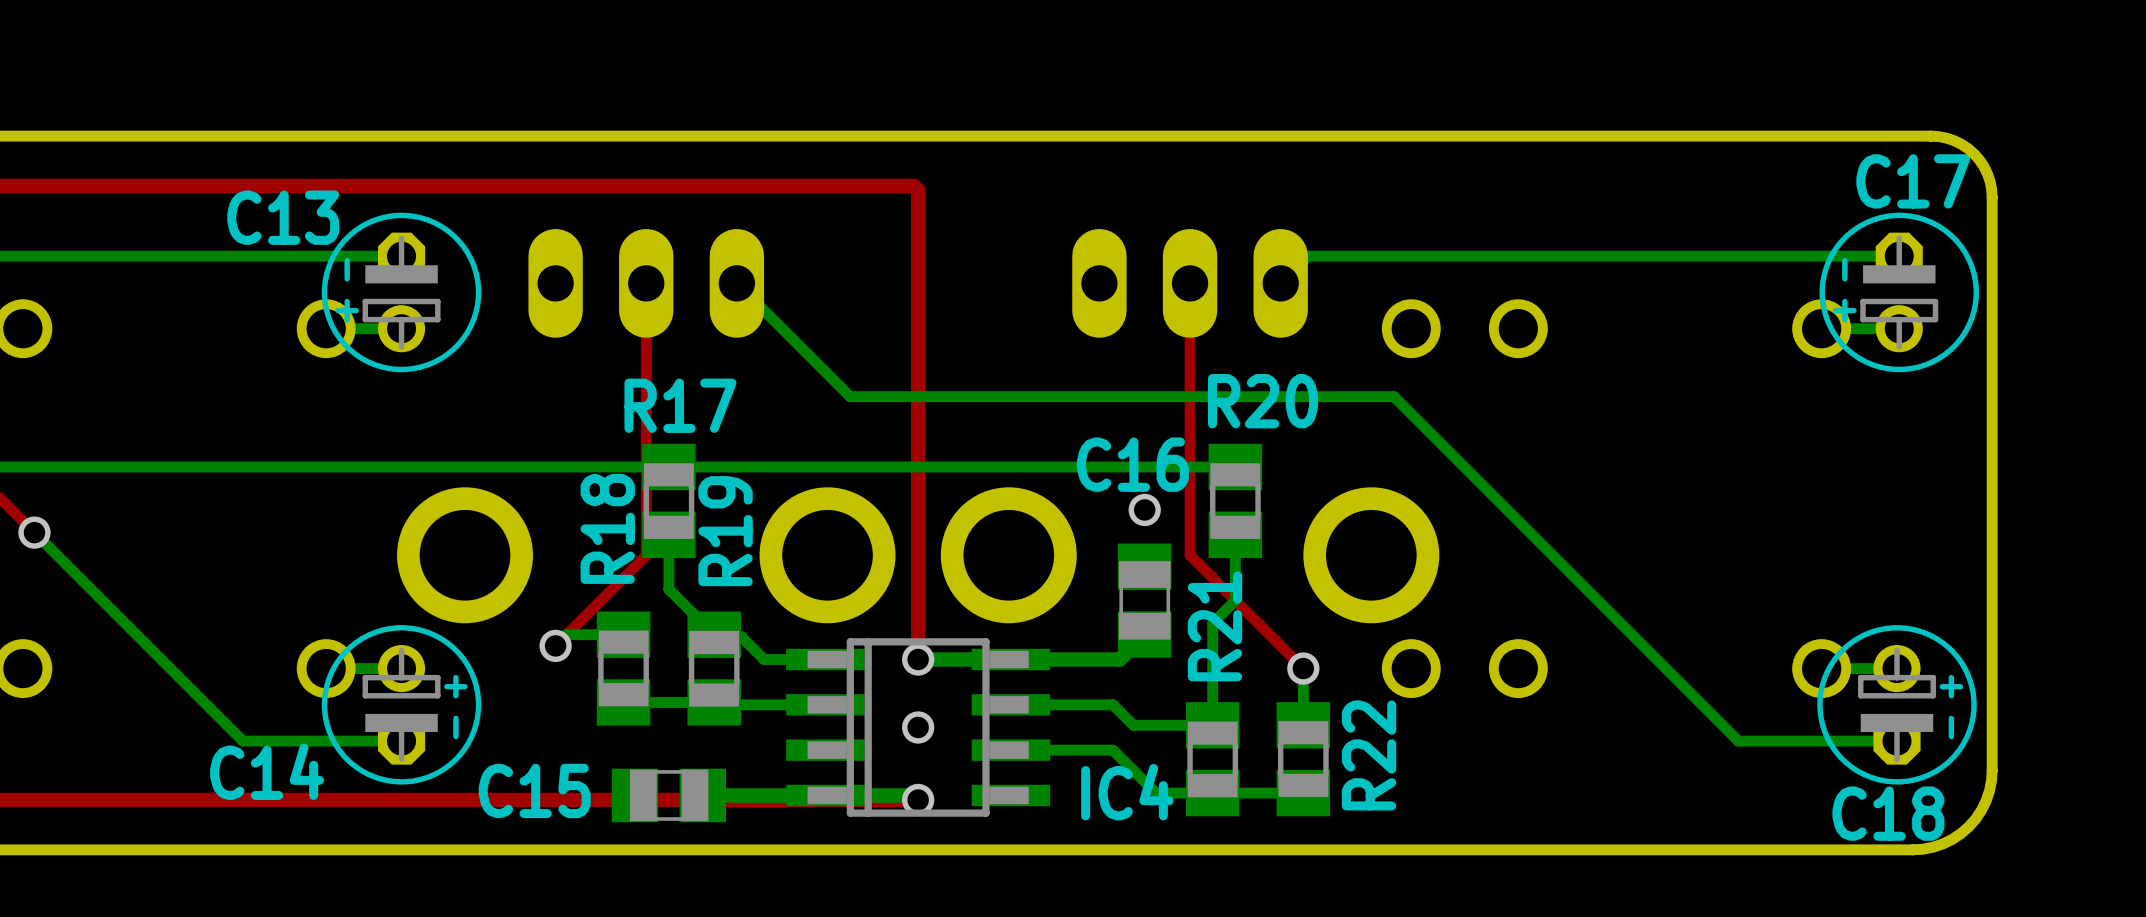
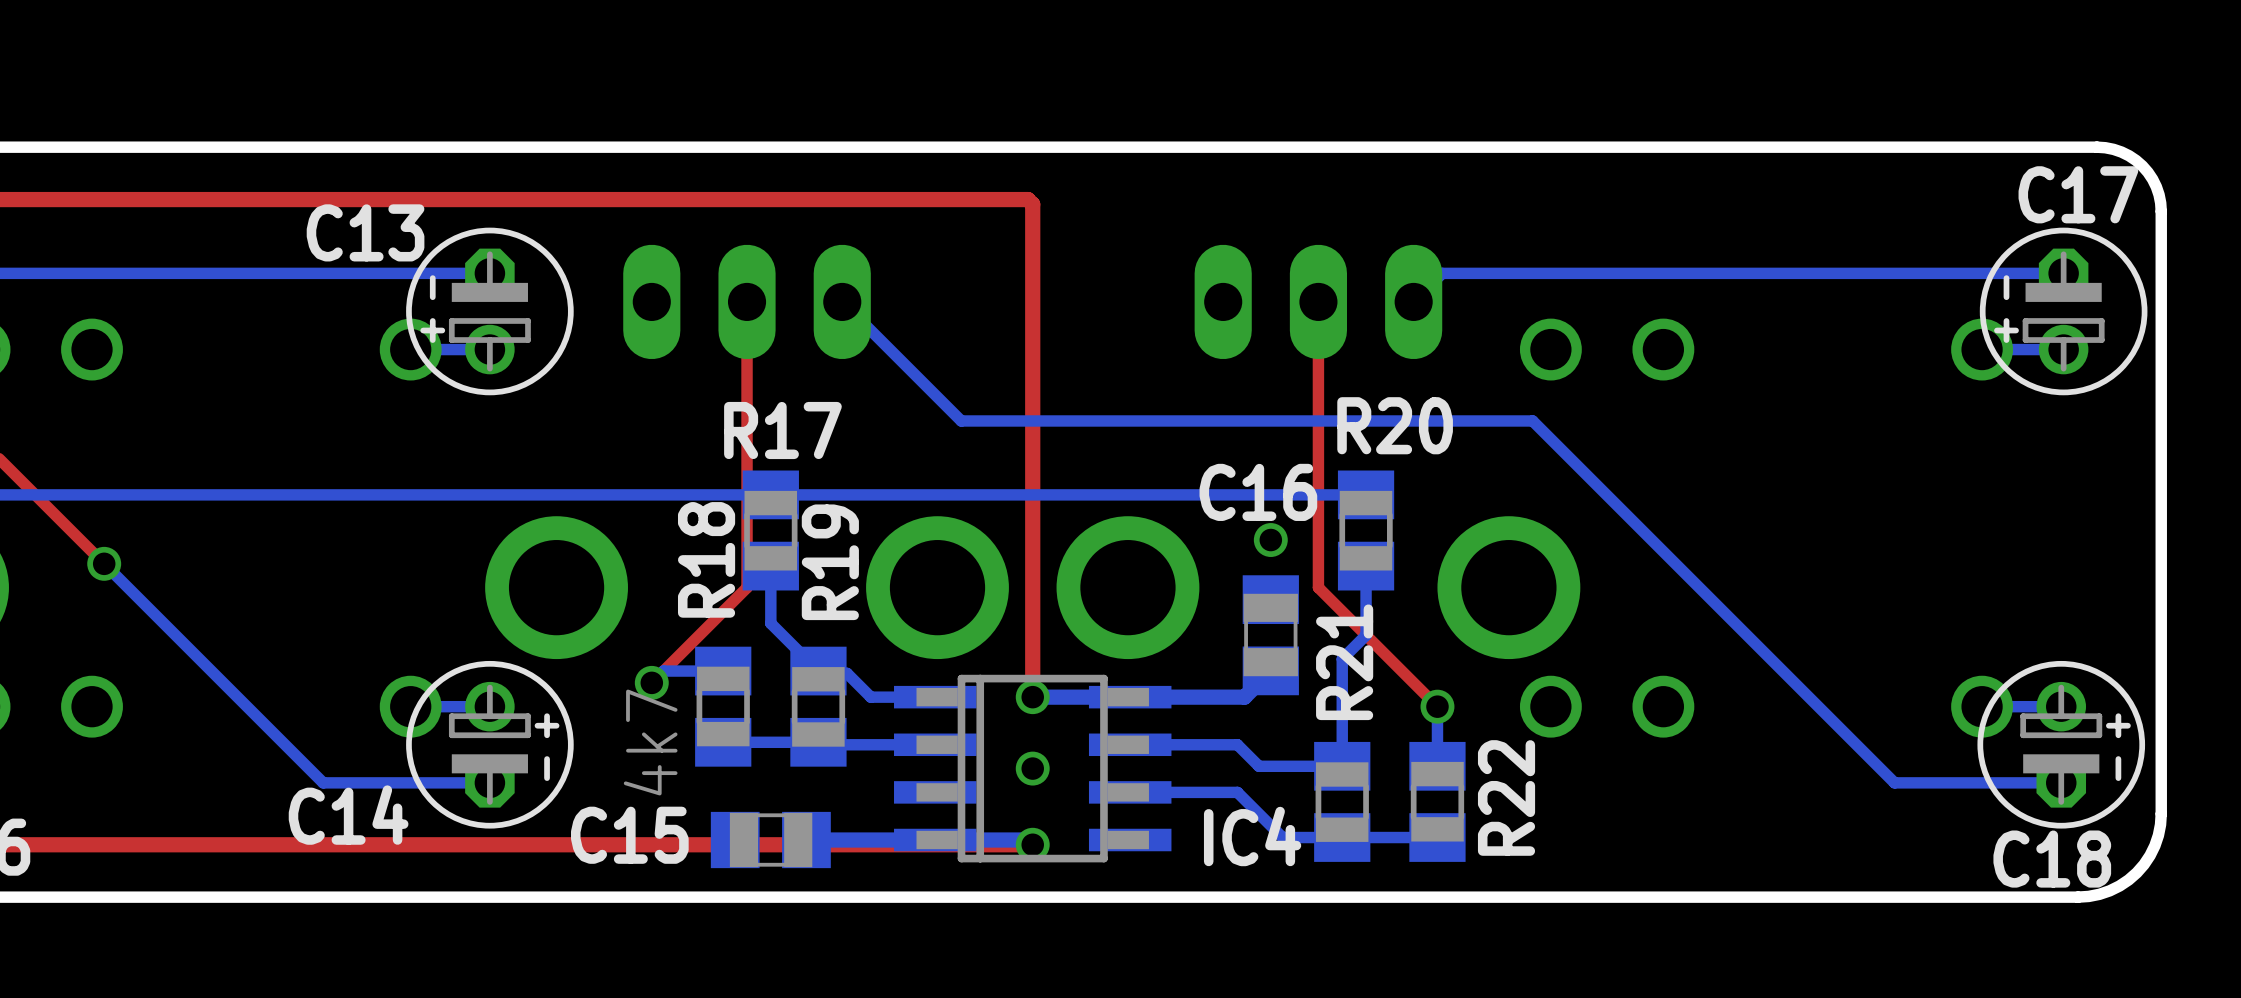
R18 value: none -> 4k7 (650, 742)

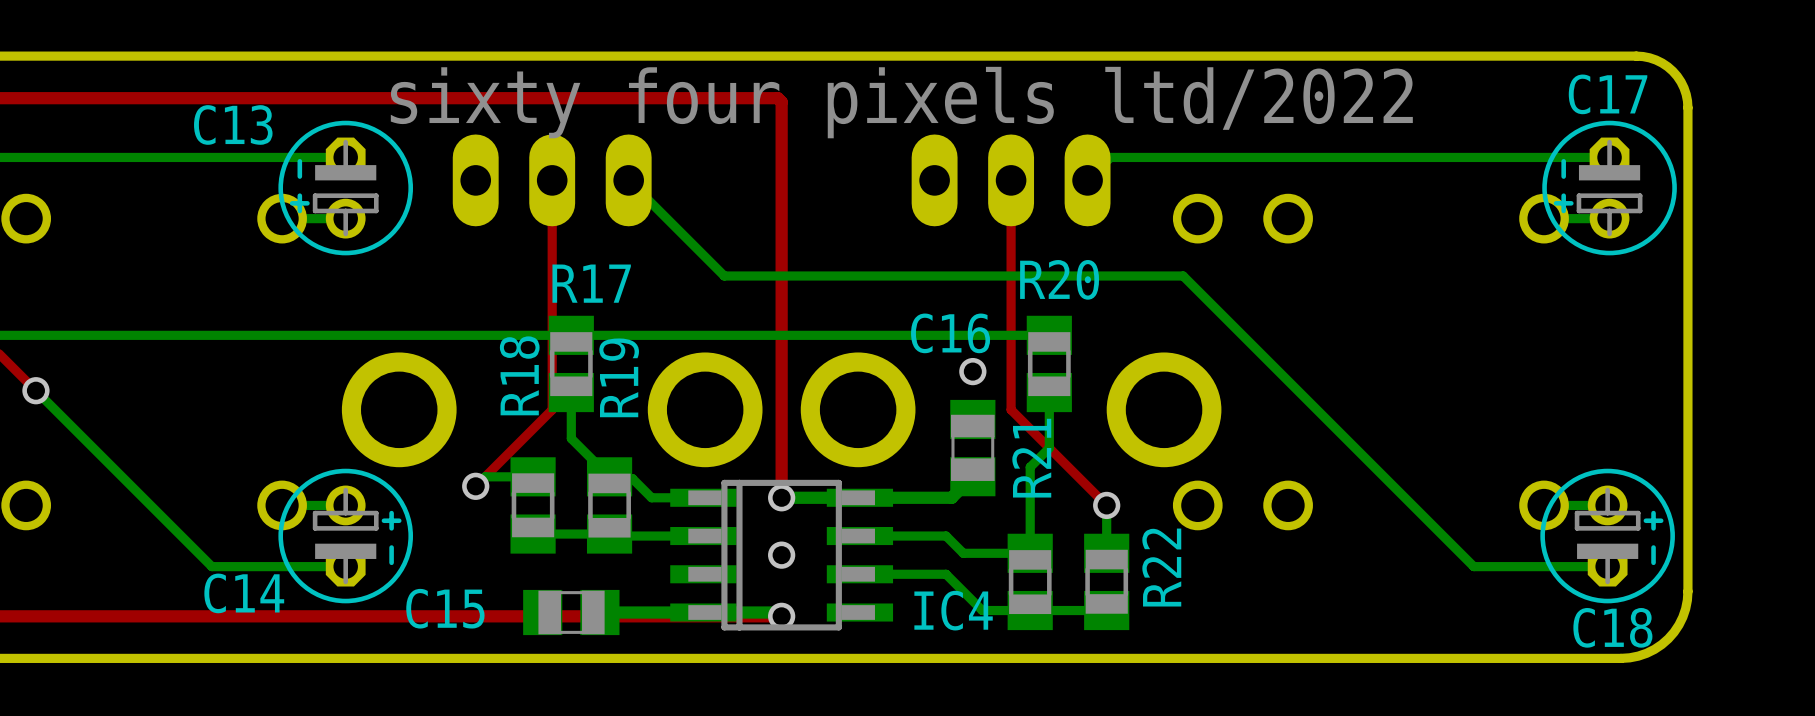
text: none -> sixty four pixels ltd/2022 (901, 102)
R18 value: 4k7 (650, 742) -> none

